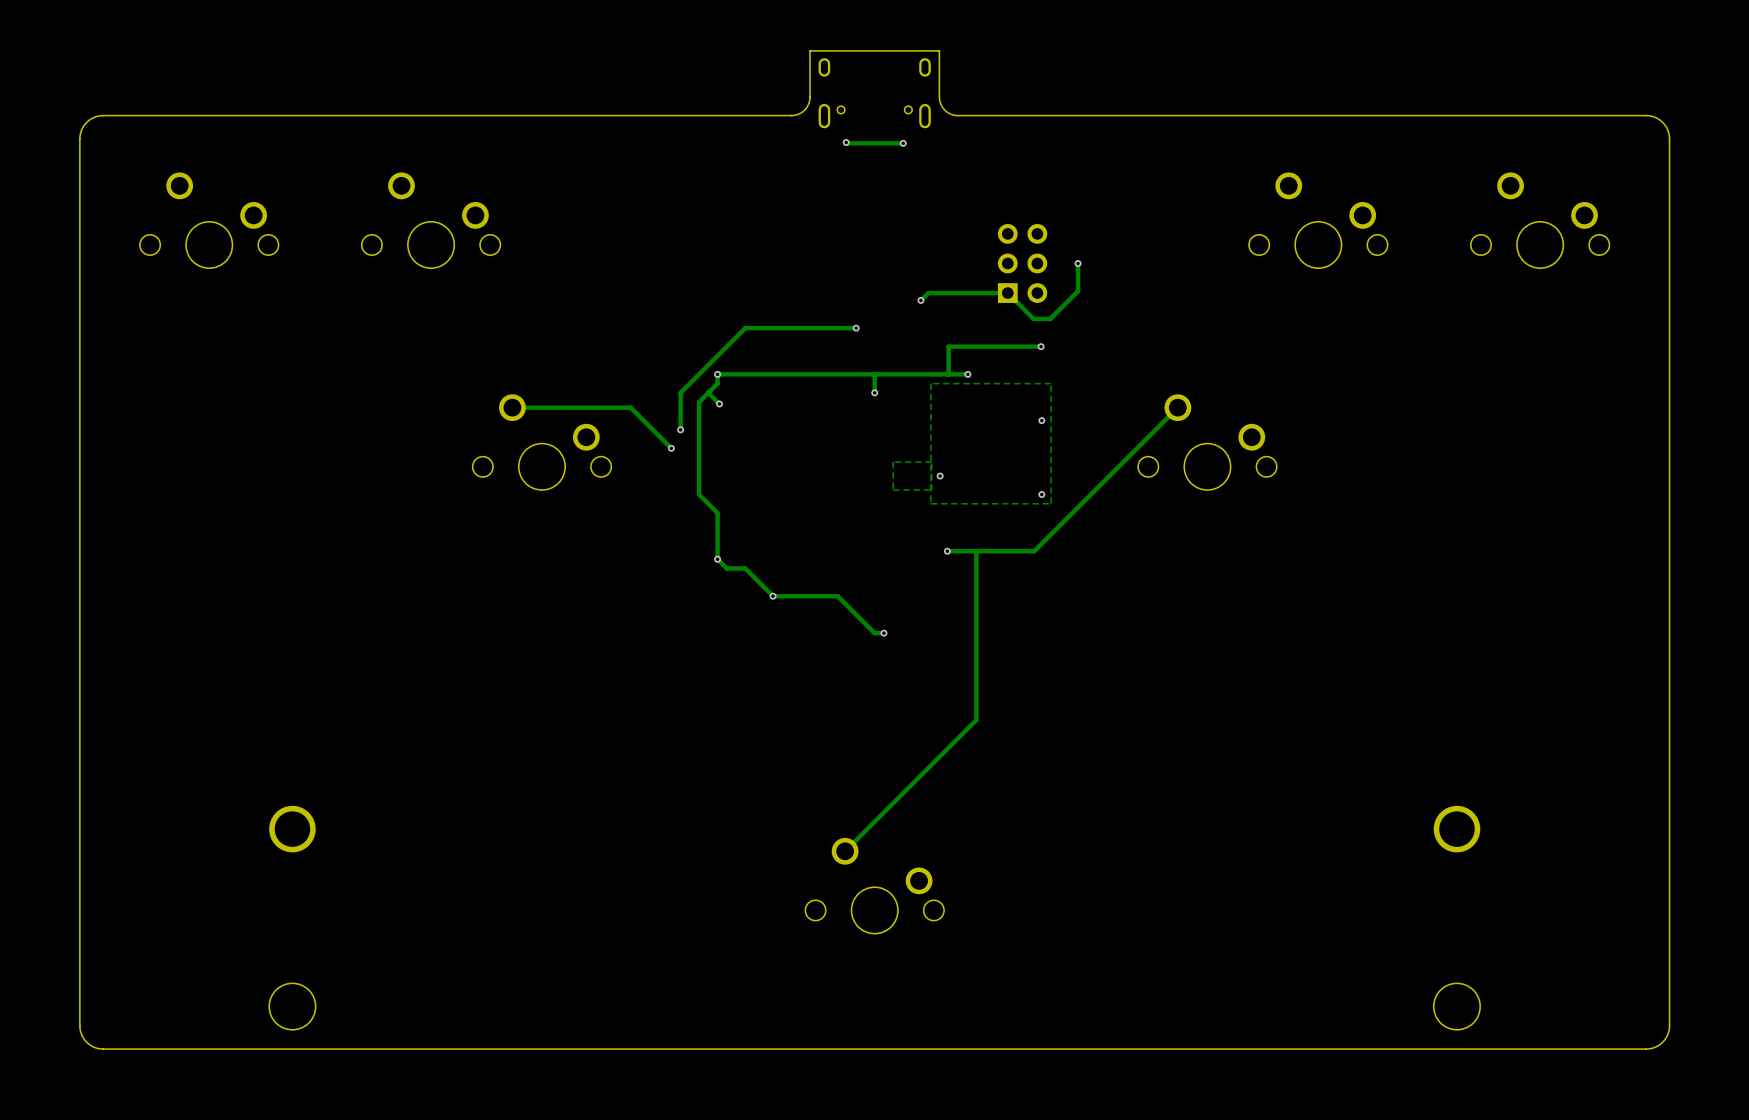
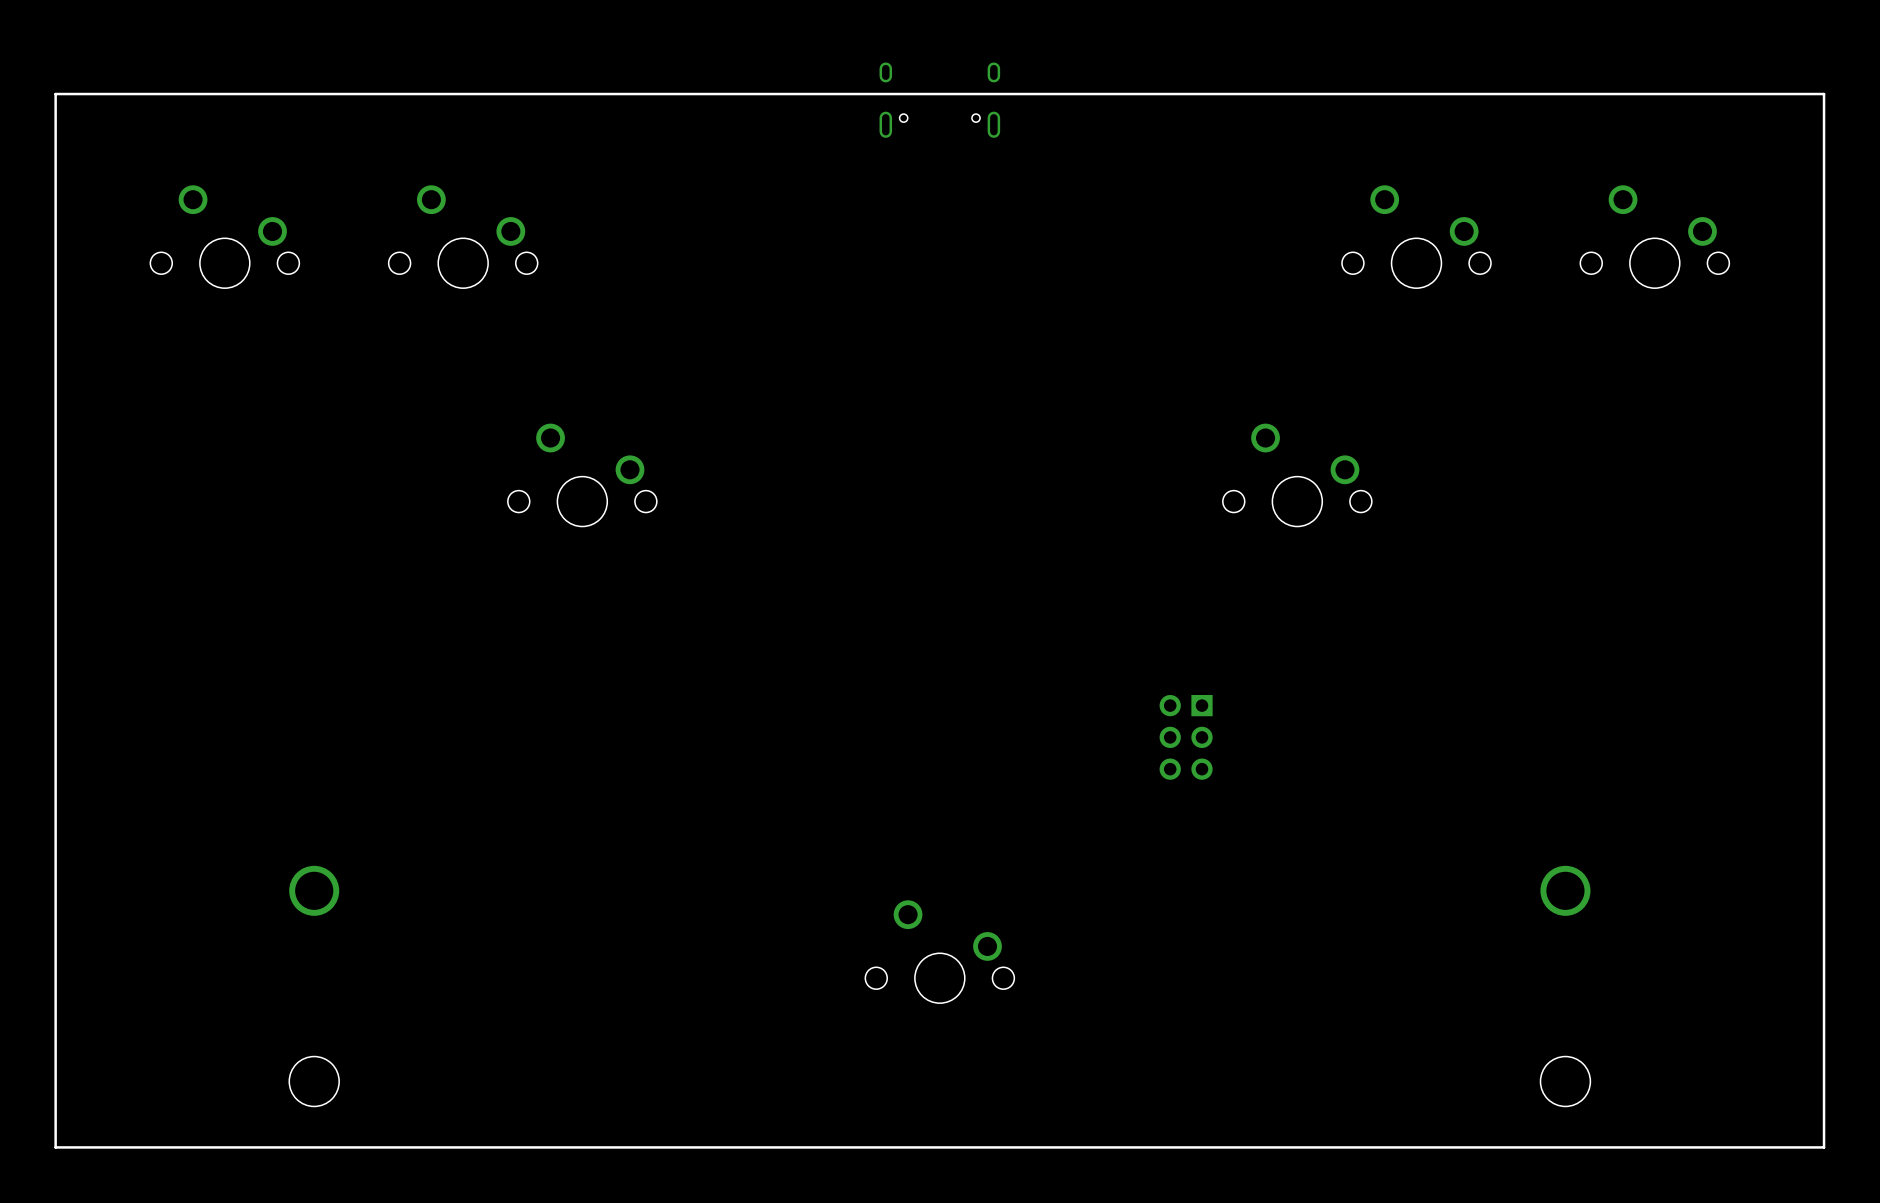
board edge: (939, 50) (940, 101) (944, 110) (955, 115) (1646, 115) (1656, 117) (1664, 124) (1669, 138) (1669, 1025) (1664, 1040) (1656, 1046) (1646, 1049) (103, 1049) (88, 1043) (82, 1035) (79, 1025) (79, 138) (84, 124) (93, 117) (103, 115) (793, 115) (802, 111) (809, 101) (810, 50) (939, 50) -> (1824, 94) (1824, 1147) (55, 1147) (55, 94) (1824, 94)
track: (846, 142) (903, 143) -> none
via: (846, 142) -> none
via: (903, 143) -> none
part: (1022, 263) -> none
track: (1078, 263) (1078, 291) (1050, 318) (1033, 318) (1007, 293) (928, 293) (920, 300) -> none
via: (1078, 263) -> none
via: (920, 300) -> none
track: (856, 328) (745, 328) (680, 392) (680, 429) -> none
via: (856, 328) -> none
track: (1041, 346) (948, 346) (948, 374) -> none
via: (1041, 346) -> none
via: (717, 374) -> none
track: (874, 374) (874, 392) -> none
track: (967, 374) (717, 374) (717, 383) (699, 402) (699, 494) (717, 513) (717, 559) (726, 568) (745, 568) (773, 596) (837, 596) (874, 633) (883, 633) -> none
via: (967, 374) -> none
zone outline: (1051, 383) (1051, 503) (930, 503) (930, 383) (1051, 383) -> none
track: (708, 392) (719, 403) -> none
via: (874, 392) -> none
via: (719, 403) -> none
track: (512, 407) (630, 407) (671, 448) -> none
track: (1177, 407) (1034, 551) (947, 551) -> none
via: (1041, 420) -> none
via: (680, 429) -> none
via: (671, 448) -> none
zone outline: (931, 462) (893, 462) (893, 490) (931, 490) (931, 462) -> none
via: (940, 476) -> none
via: (1041, 494) -> none
via: (947, 551) -> none
track: (976, 551) (976, 720) (845, 851) -> none
via: (717, 559) -> none
via: (773, 596) -> none
via: (883, 633) -> none
part: none -> (1186, 737)

